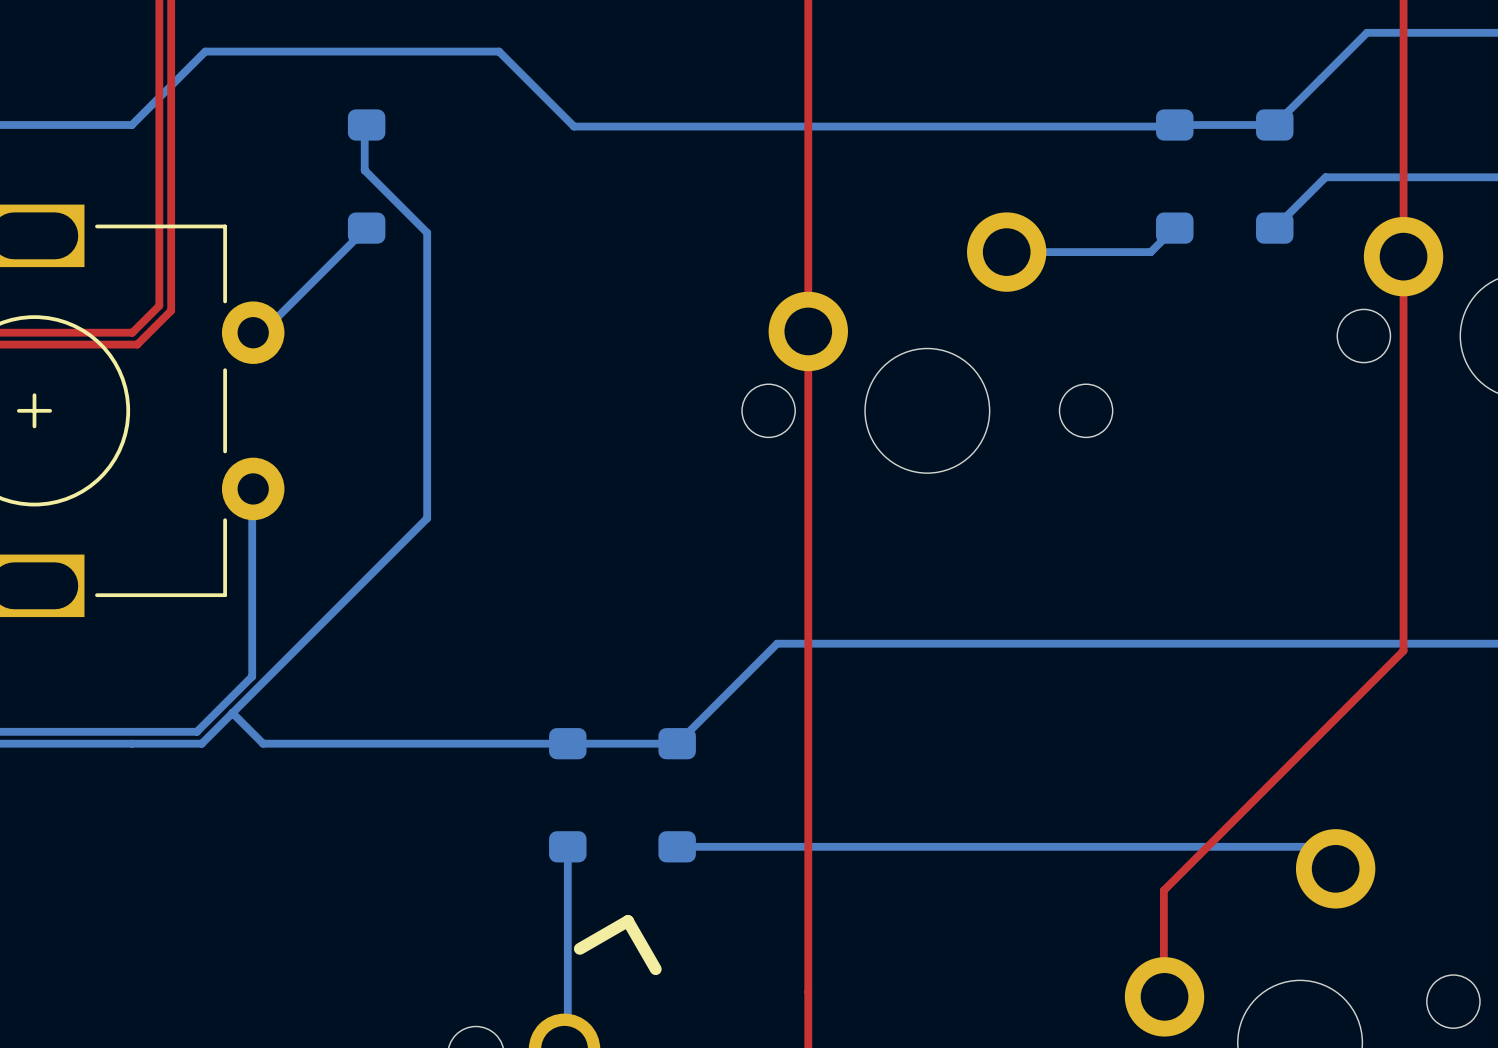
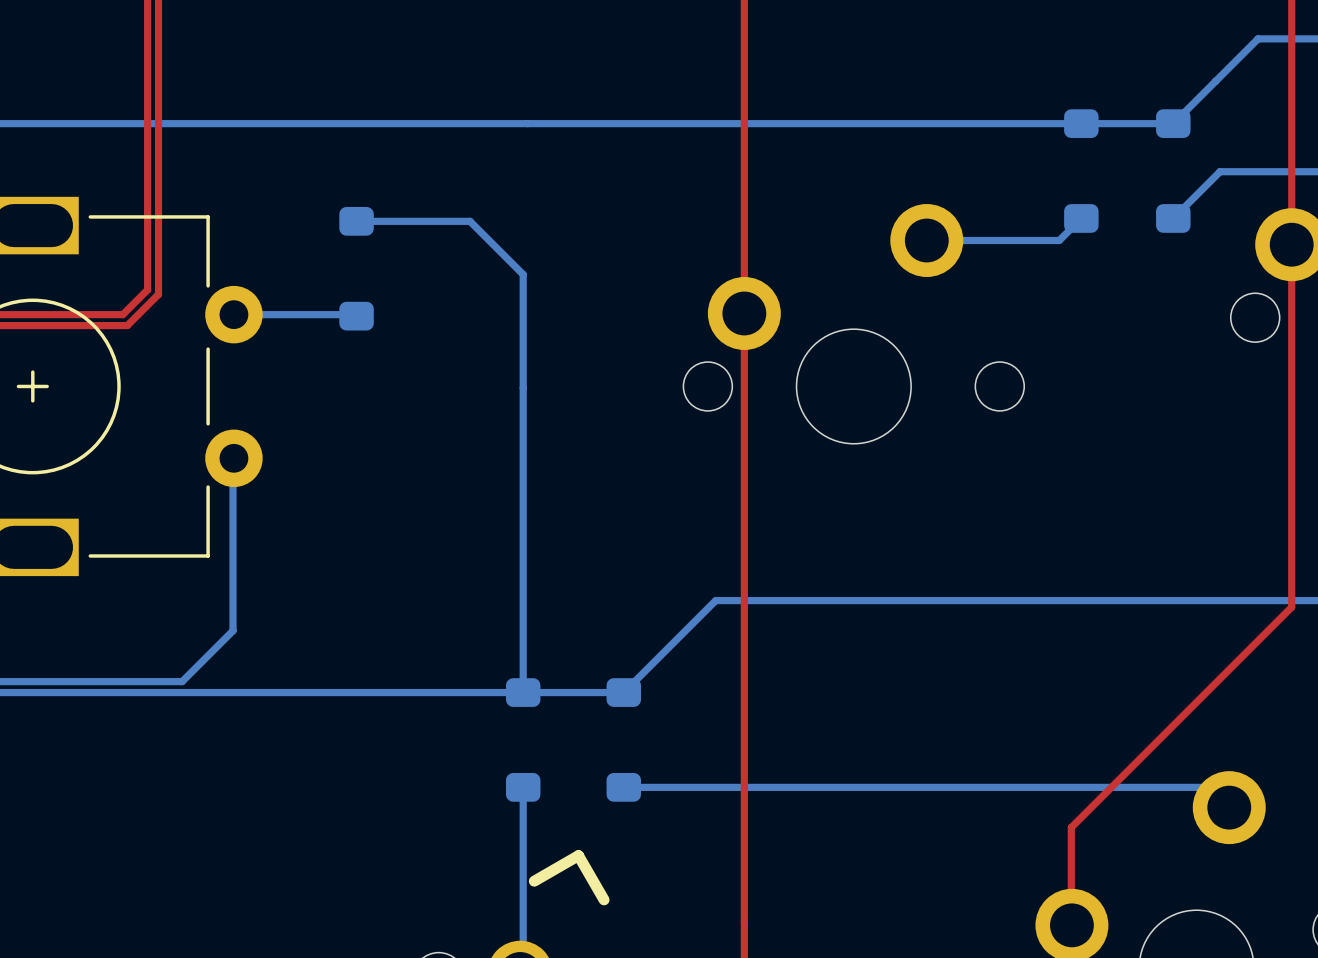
bottom track: (364, 123) (364, 170) (427, 232) (427, 518) (201, 743) -> none
bottom track: (131, 124) (205, 51) (499, 51) (574, 126) (1173, 126) -> (122, 123) (1081, 123)
part position: (366, 176) -> (356, 268)
bottom track: (366, 228) (262, 332) -> (356, 316) (242, 314)
bottom track: none -> (356, 221) (470, 221) (523, 274) (523, 692)
bottom track: (232, 713) (263, 743) -> (186, 692) (243, 692)

